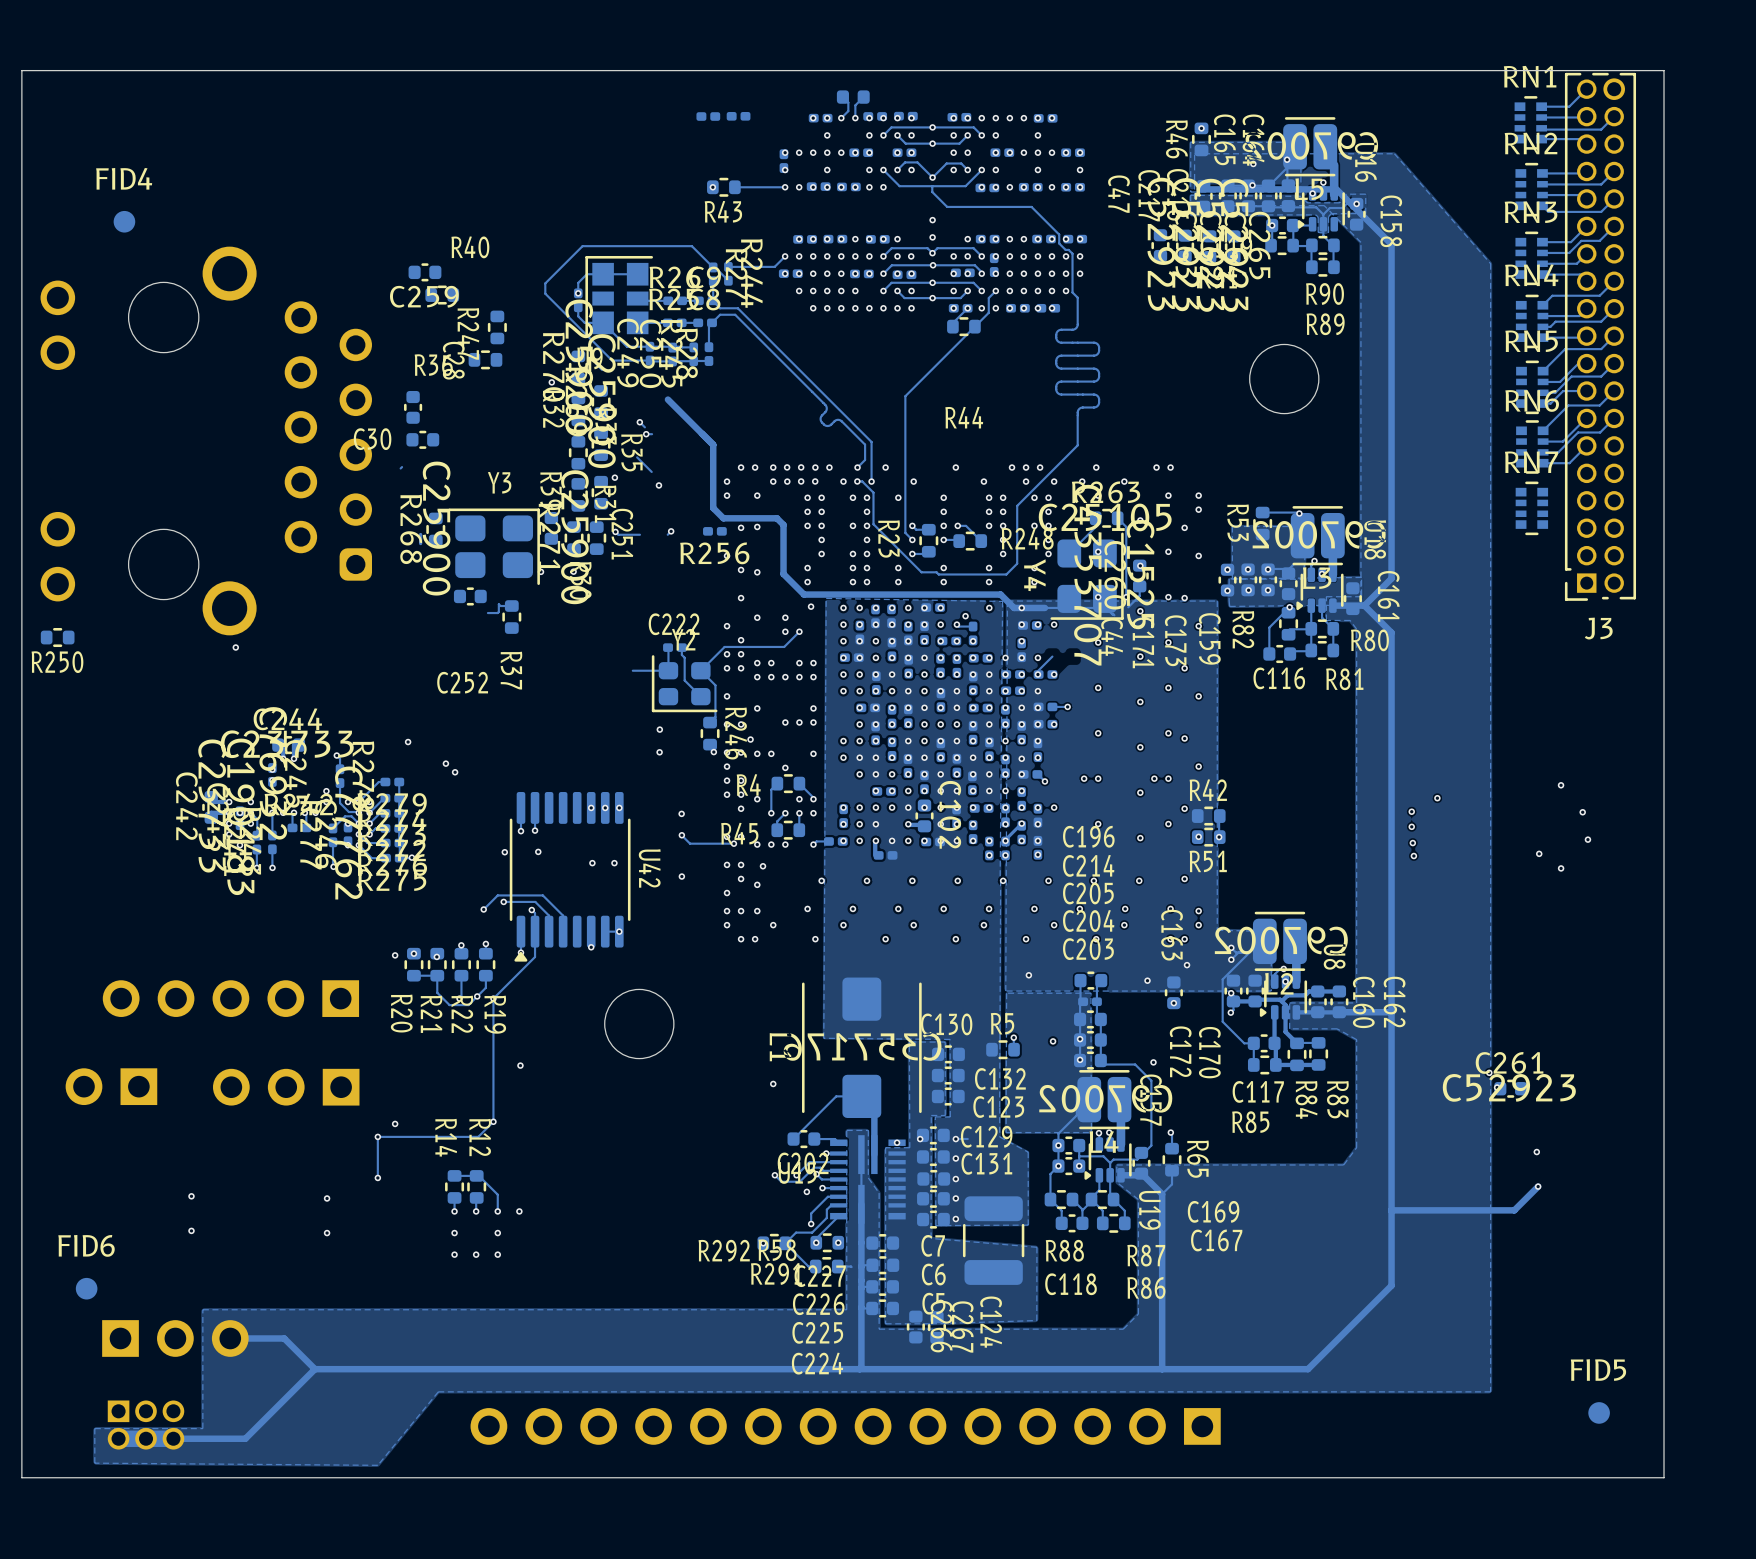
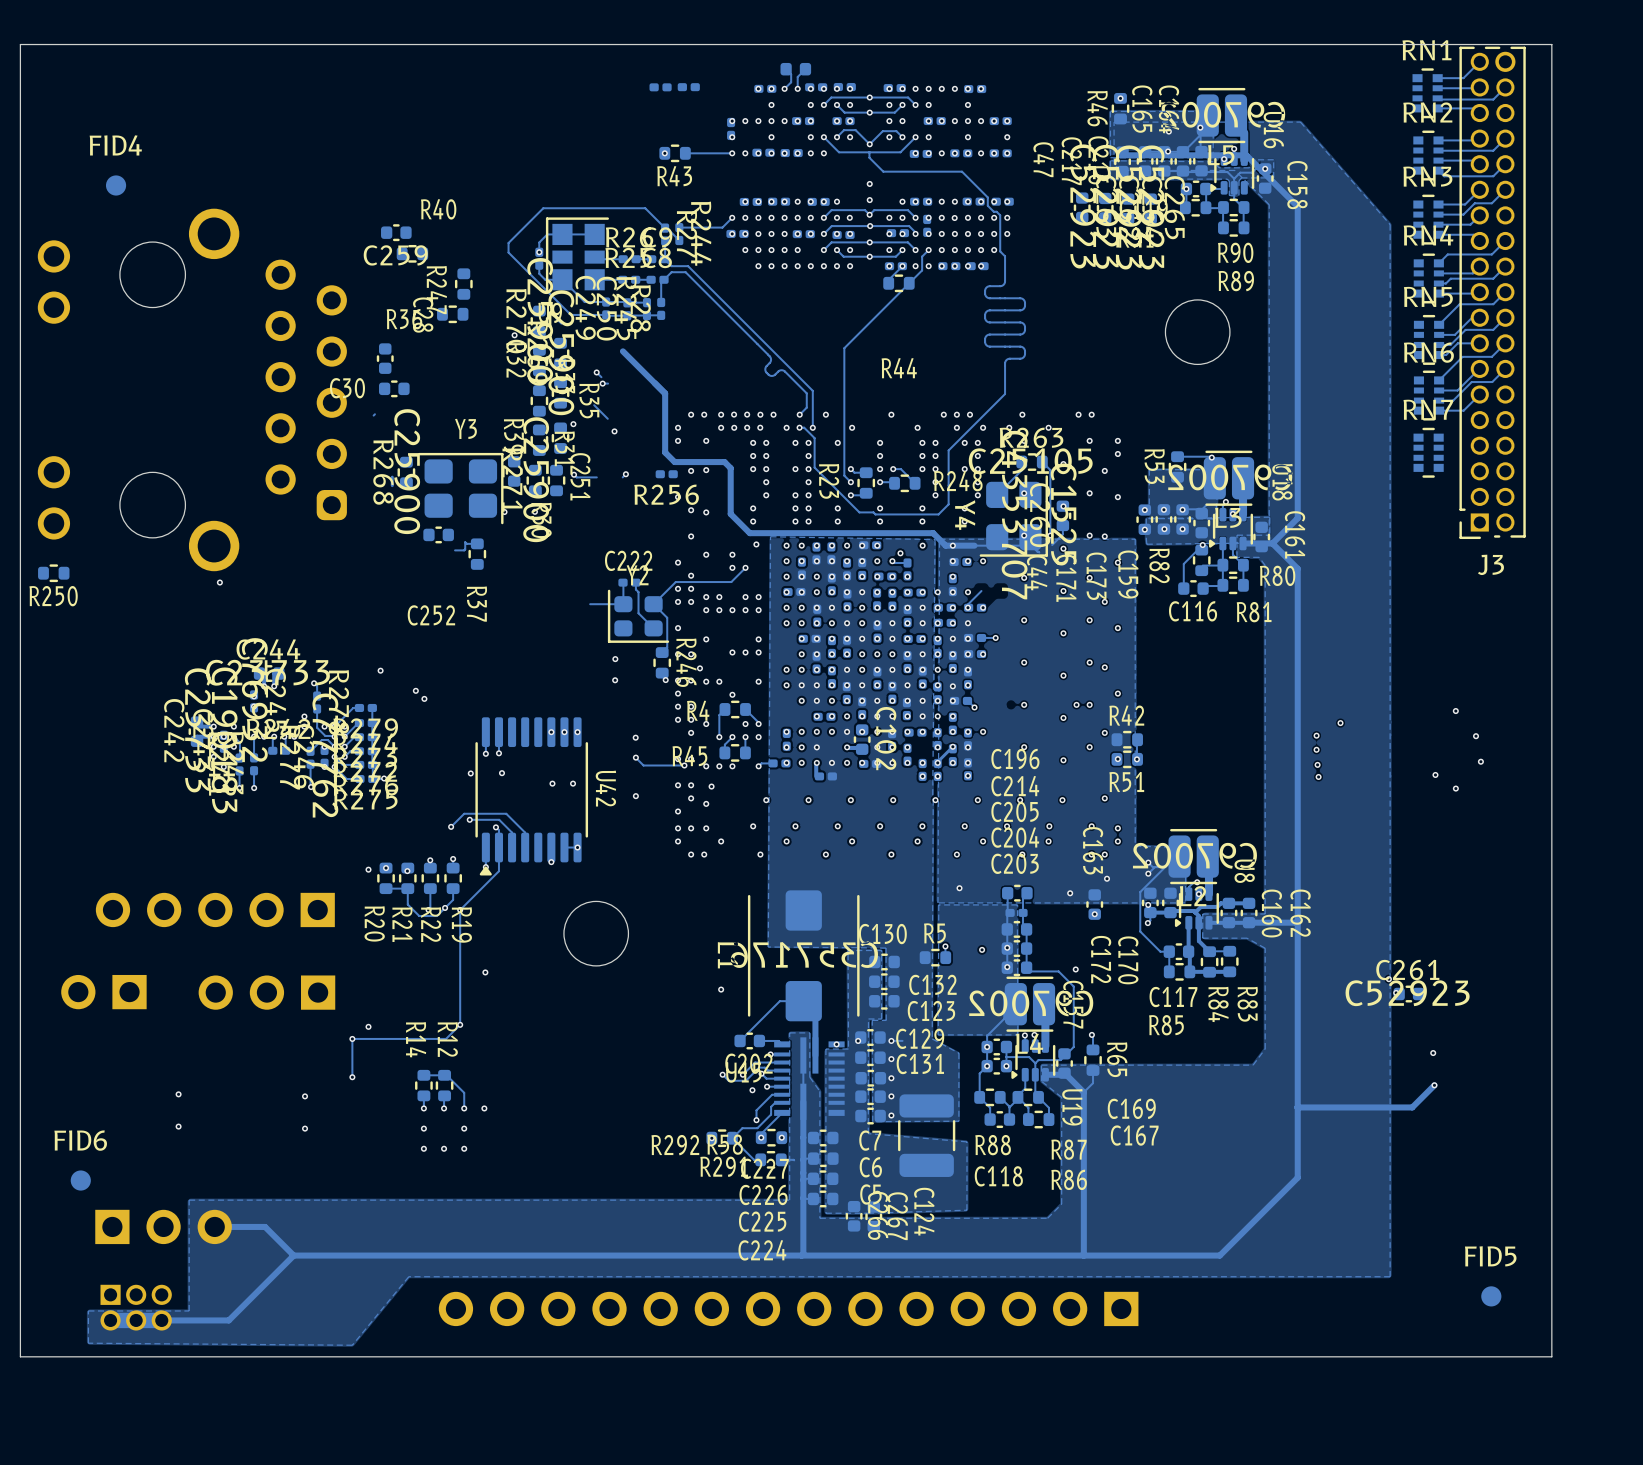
via: (1084, 778) -> none

